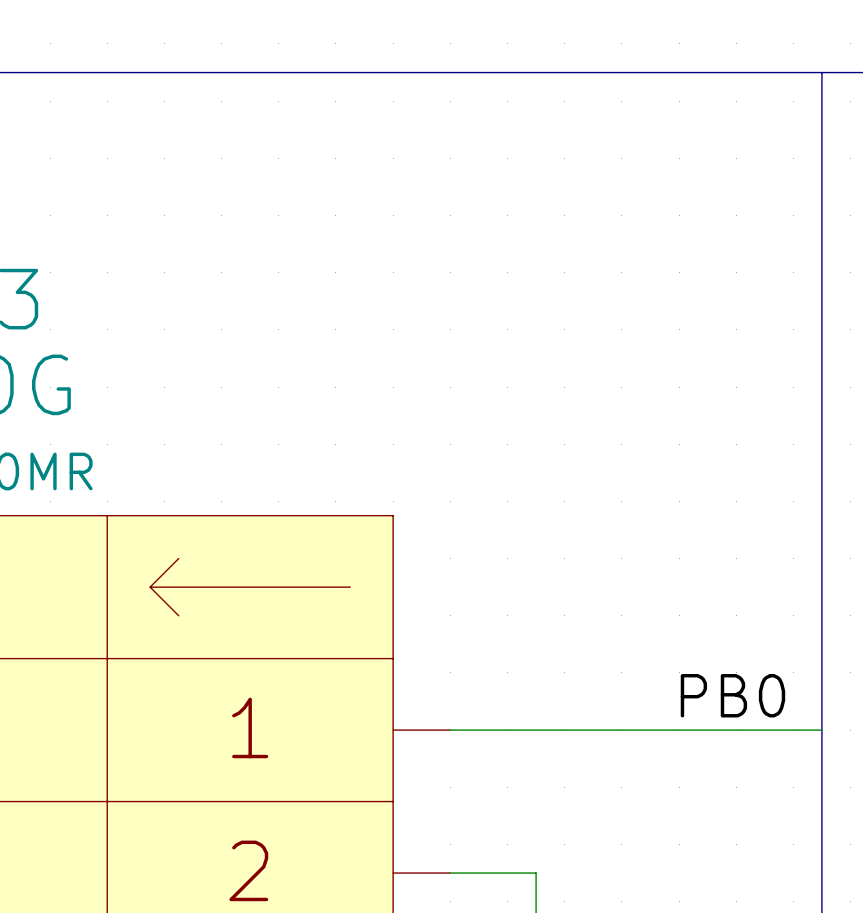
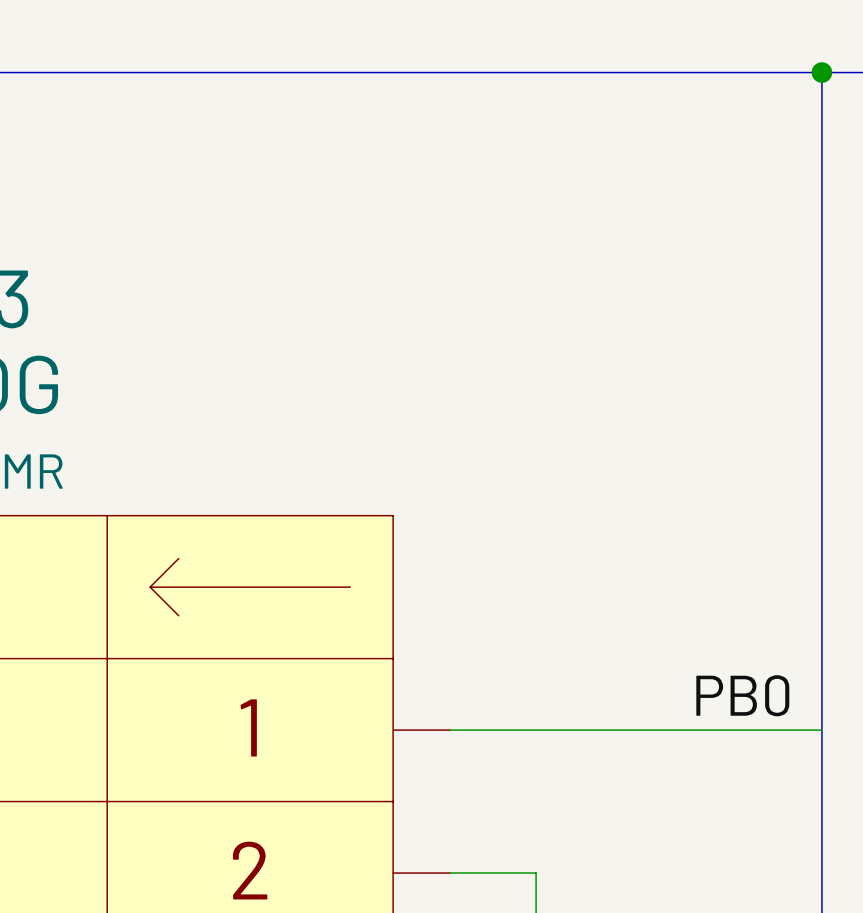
junction: none -> (821, 72)

